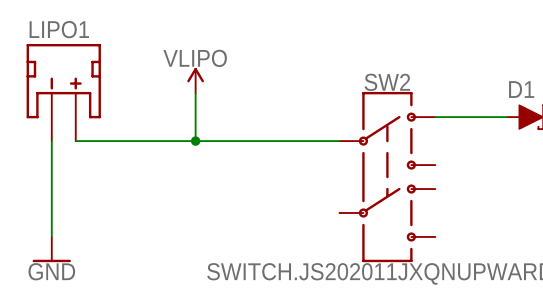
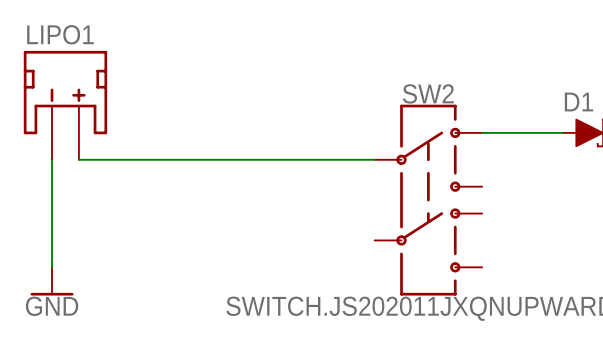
power symbol: VLIPO (195, 80) -> none
wire: (195, 93) (195, 141) -> none
junction: (195, 141) -> none

